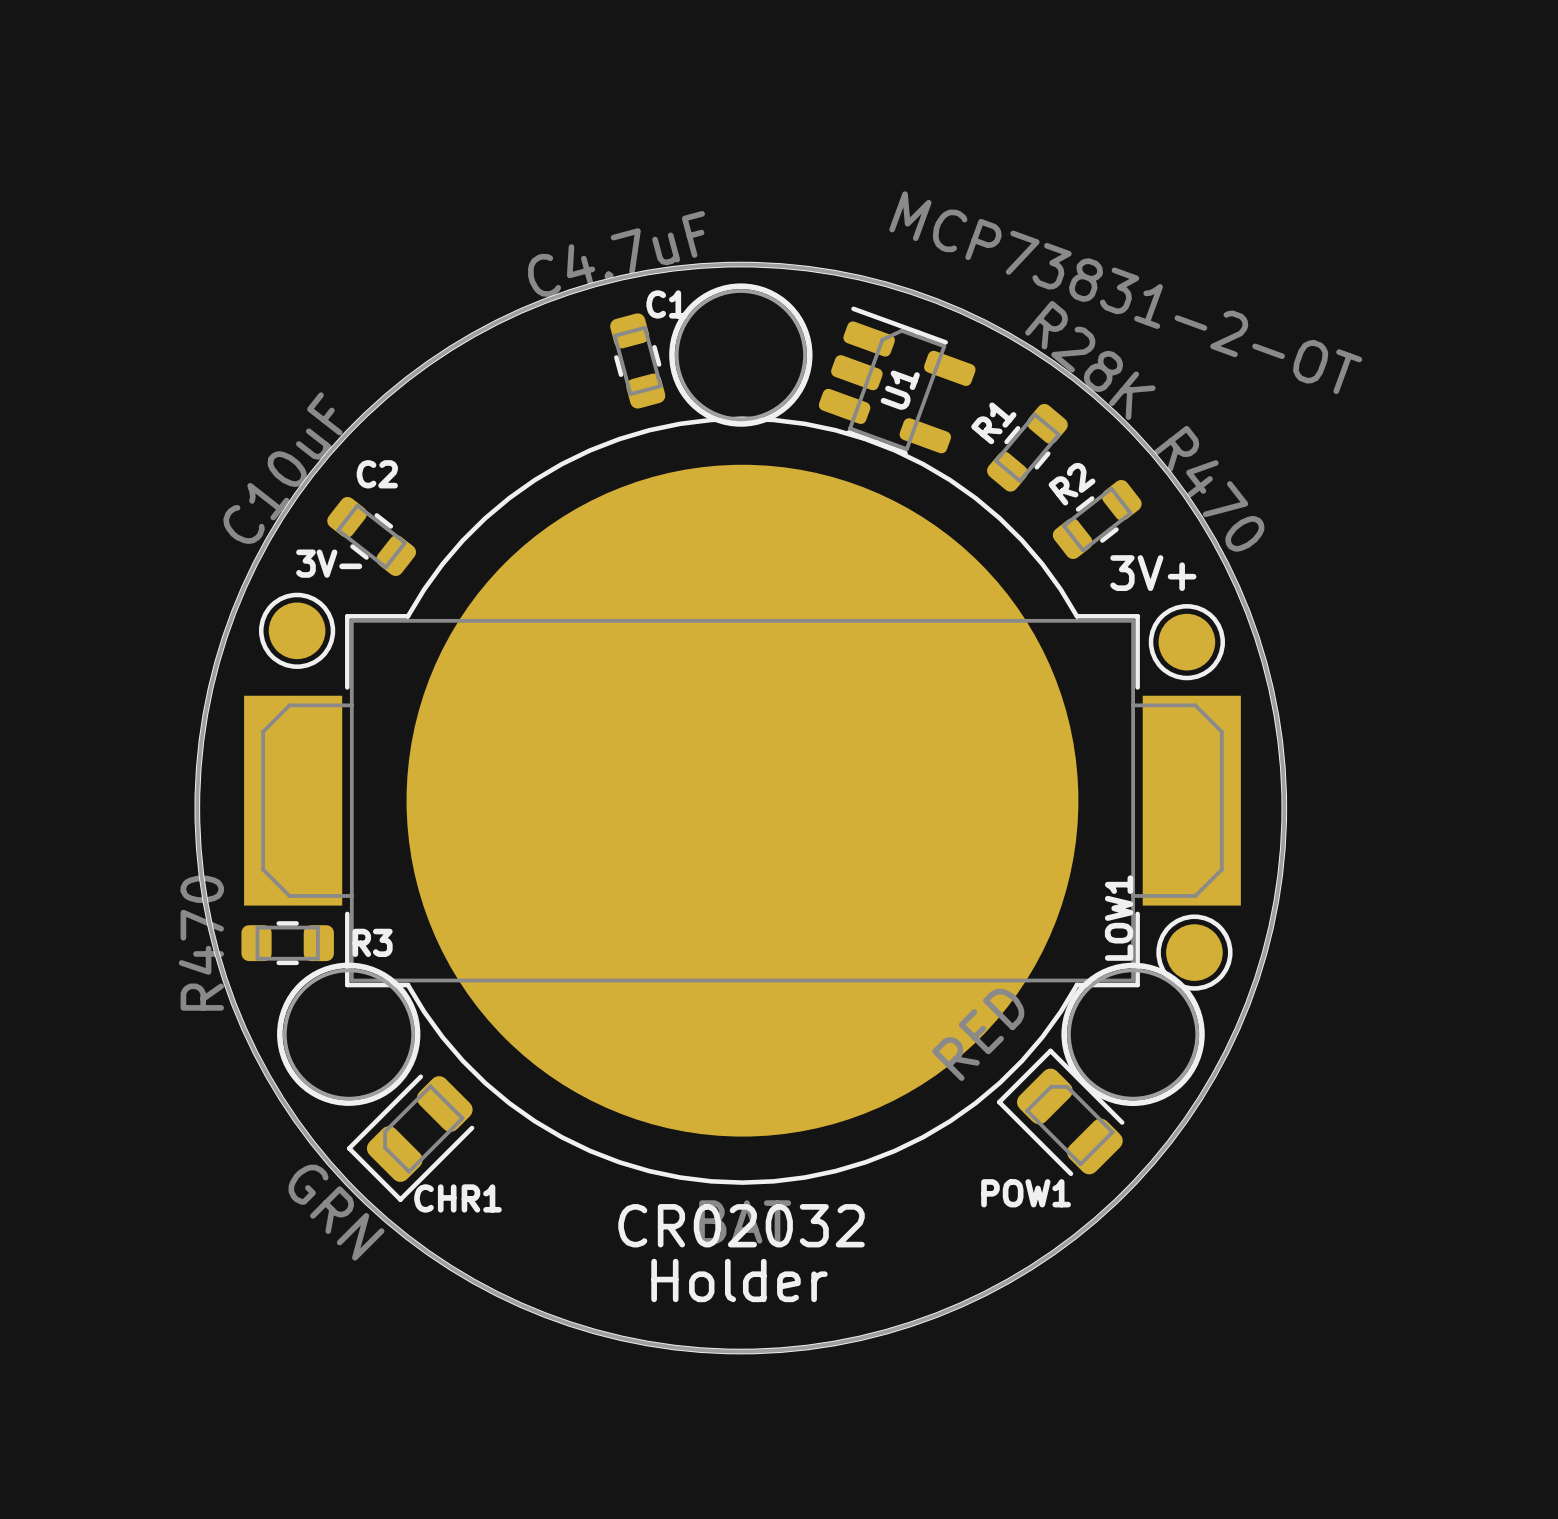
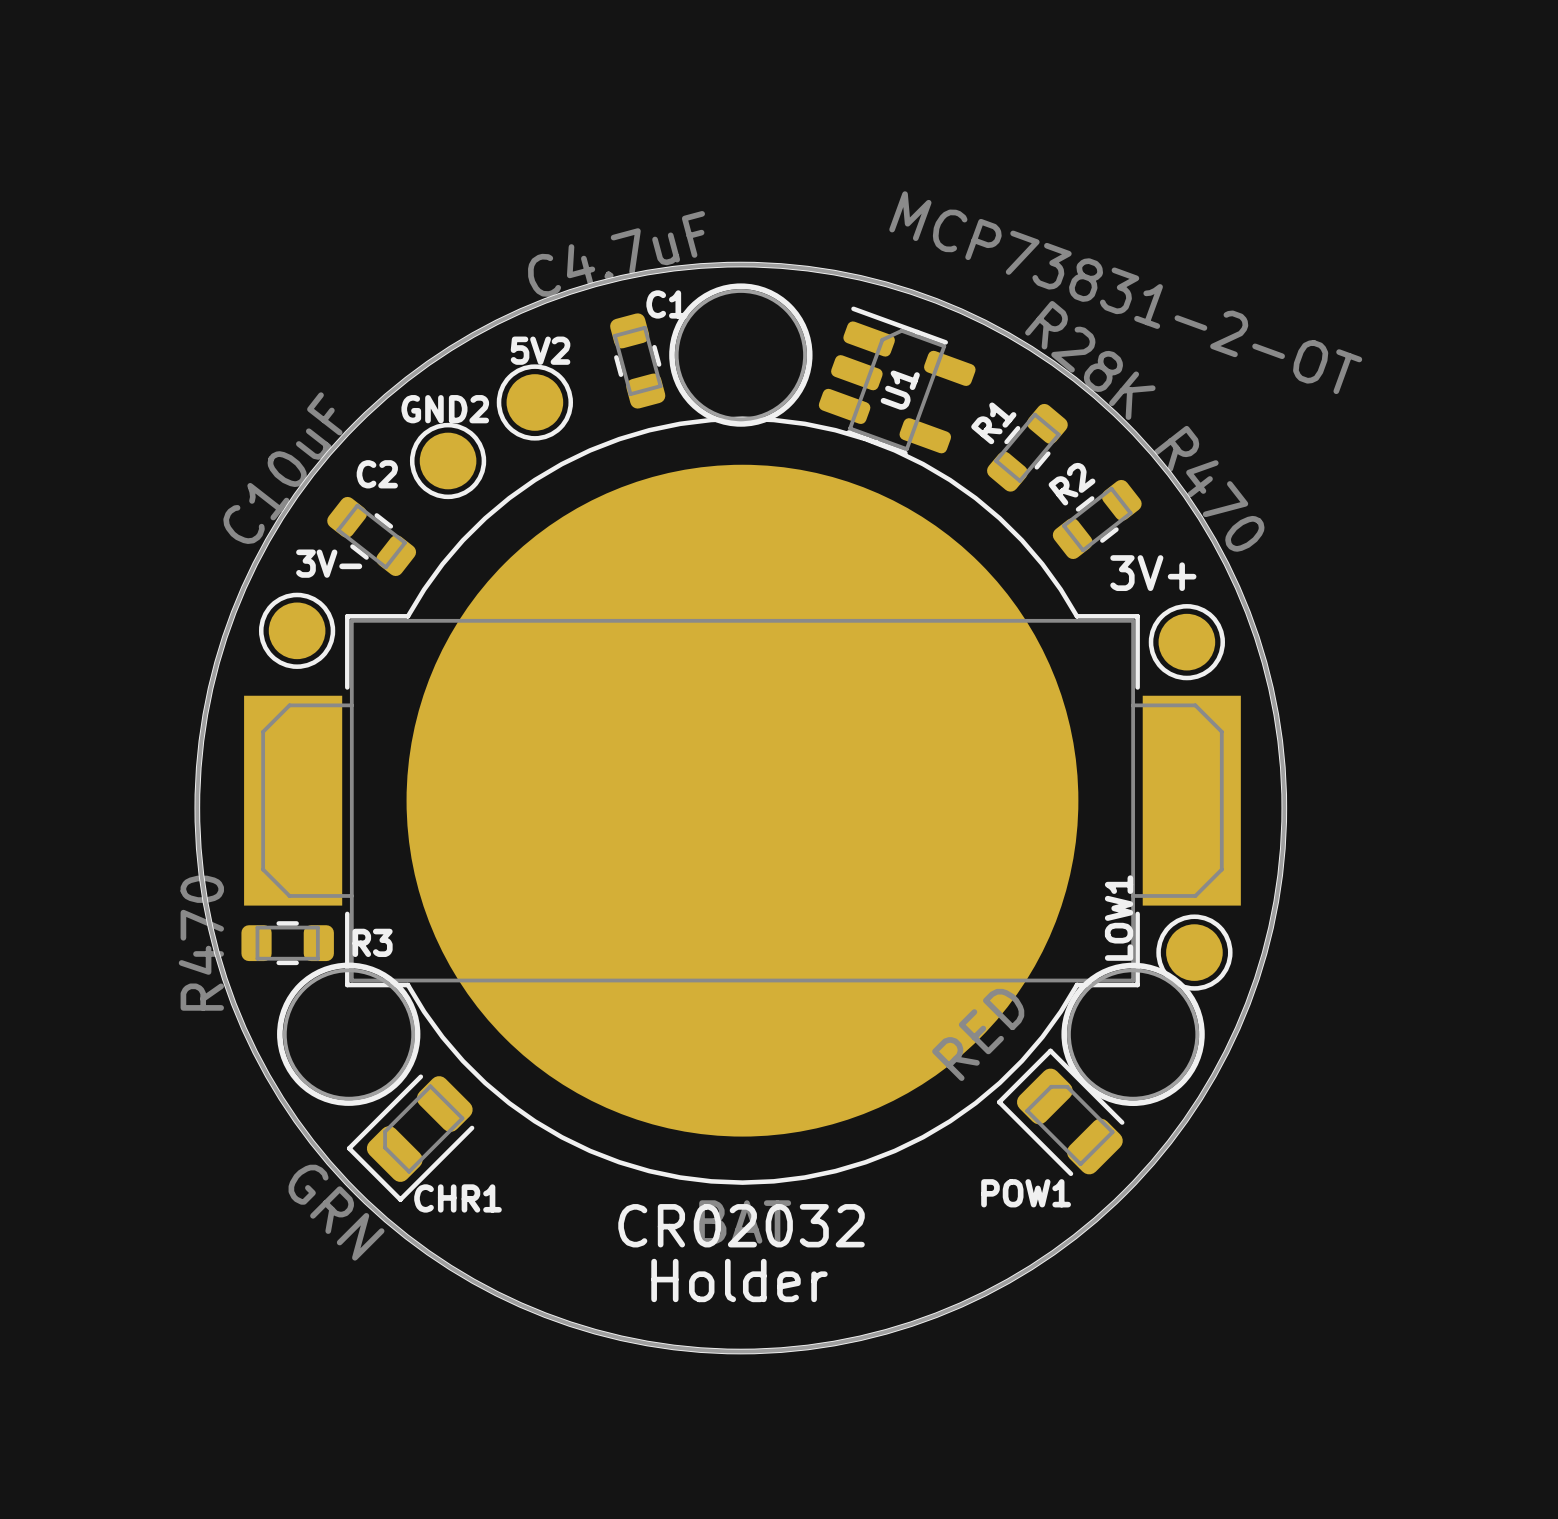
5V2: none -> (534, 402)
GND2: none -> (448, 460)

